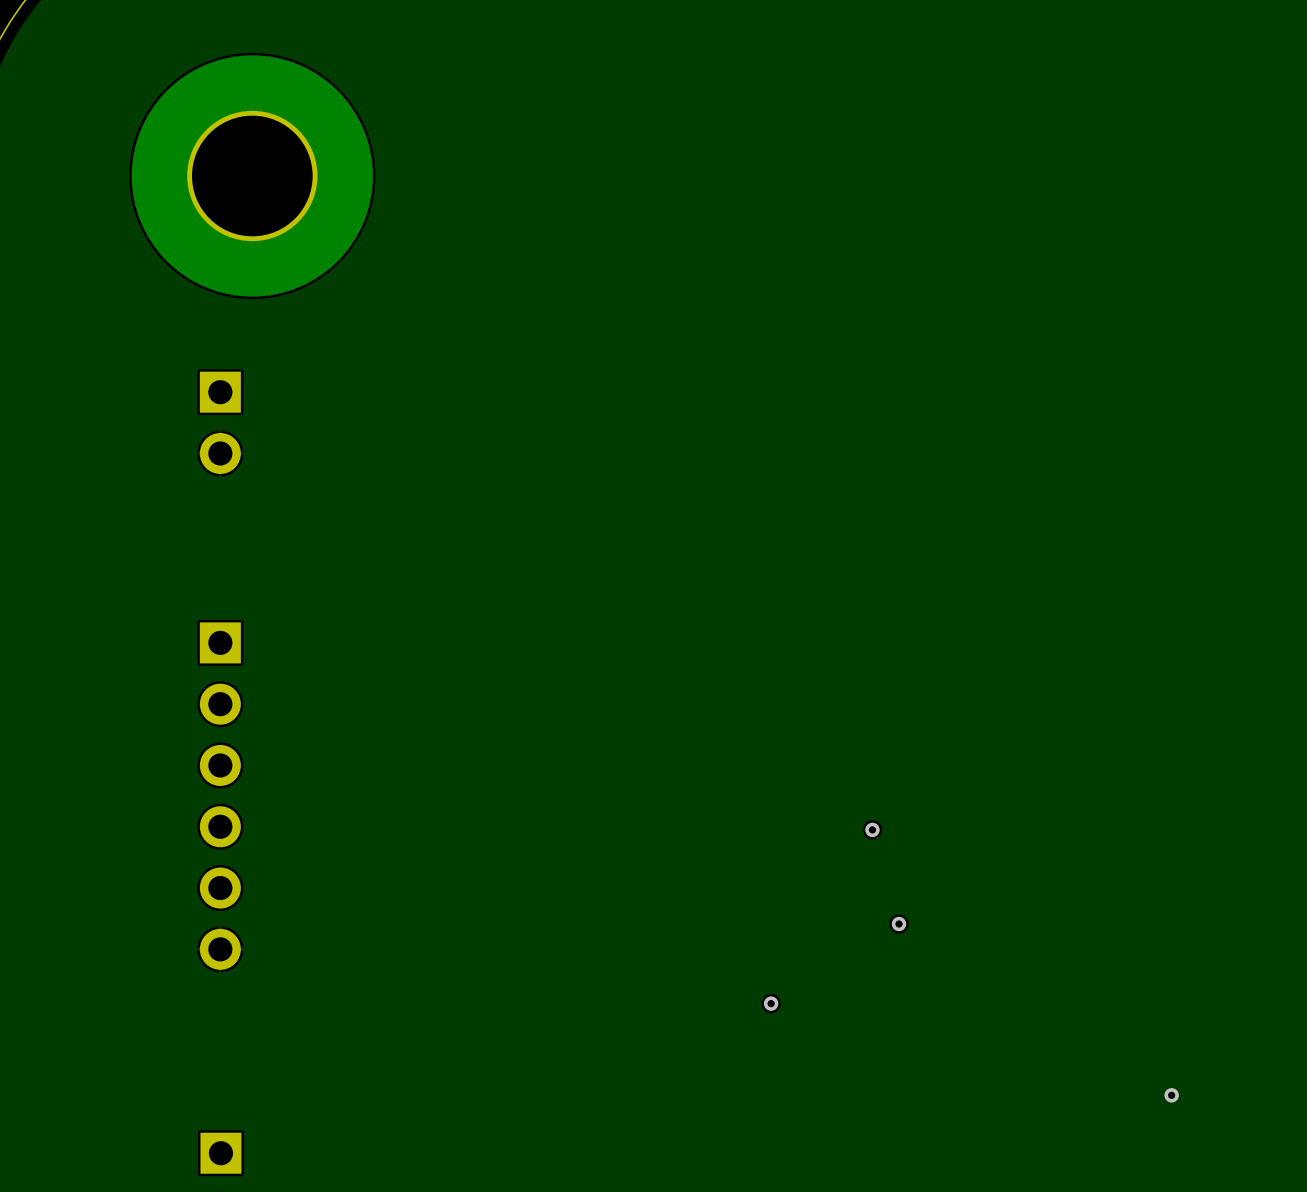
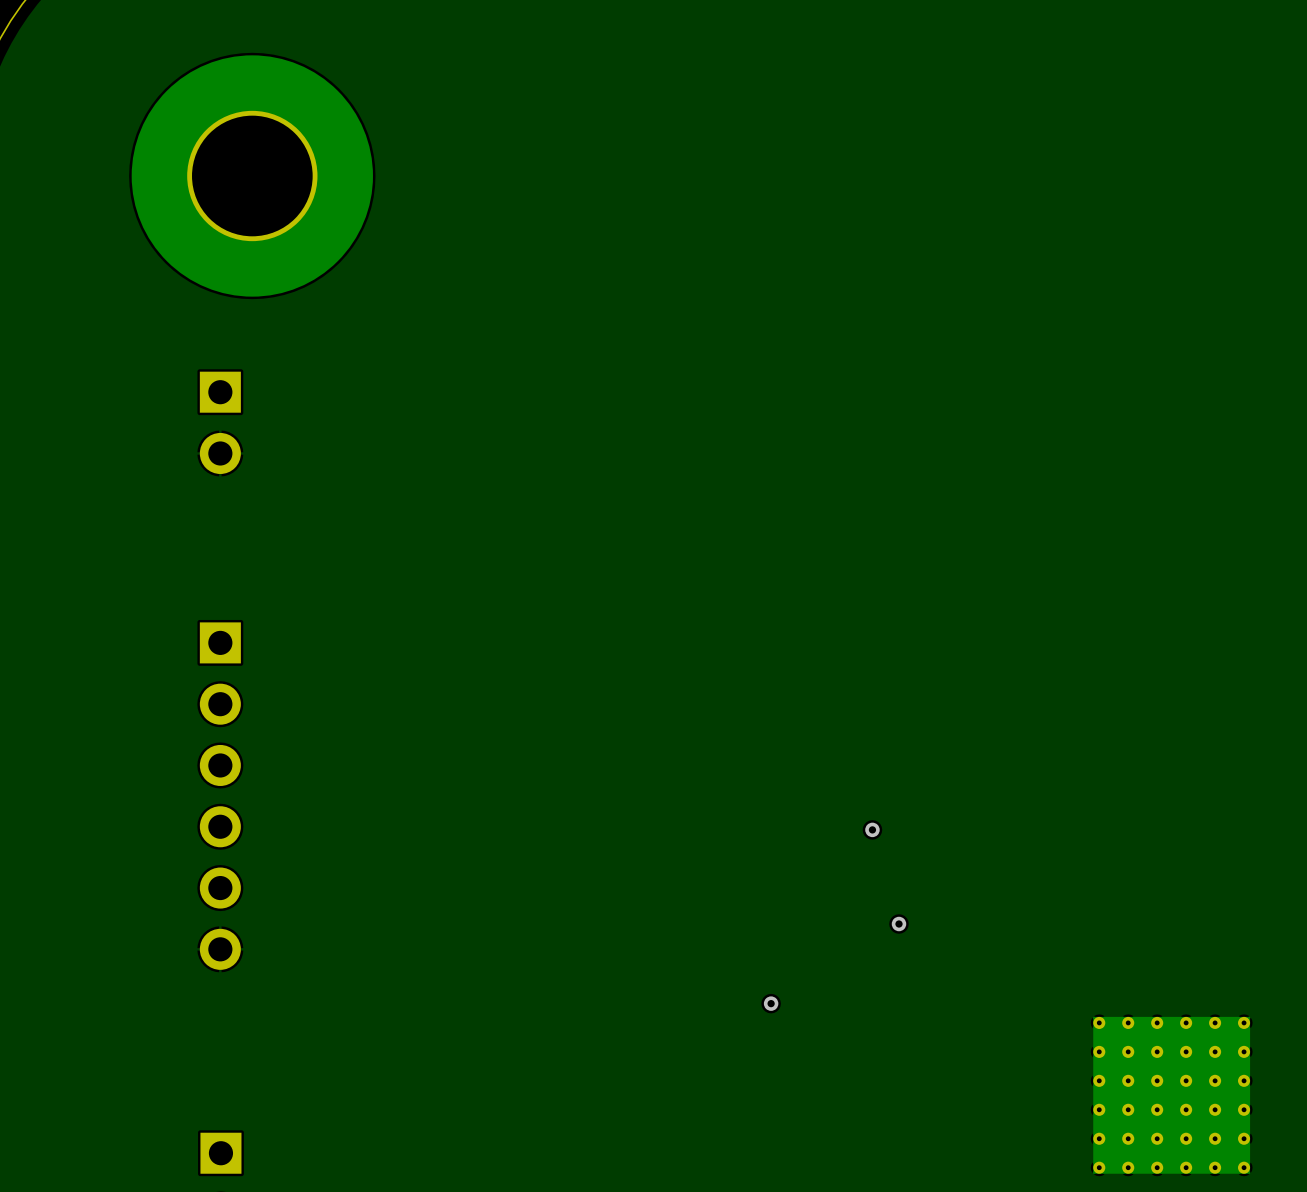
via: (1171, 1095) -> none
part: none -> (1171, 1095)

